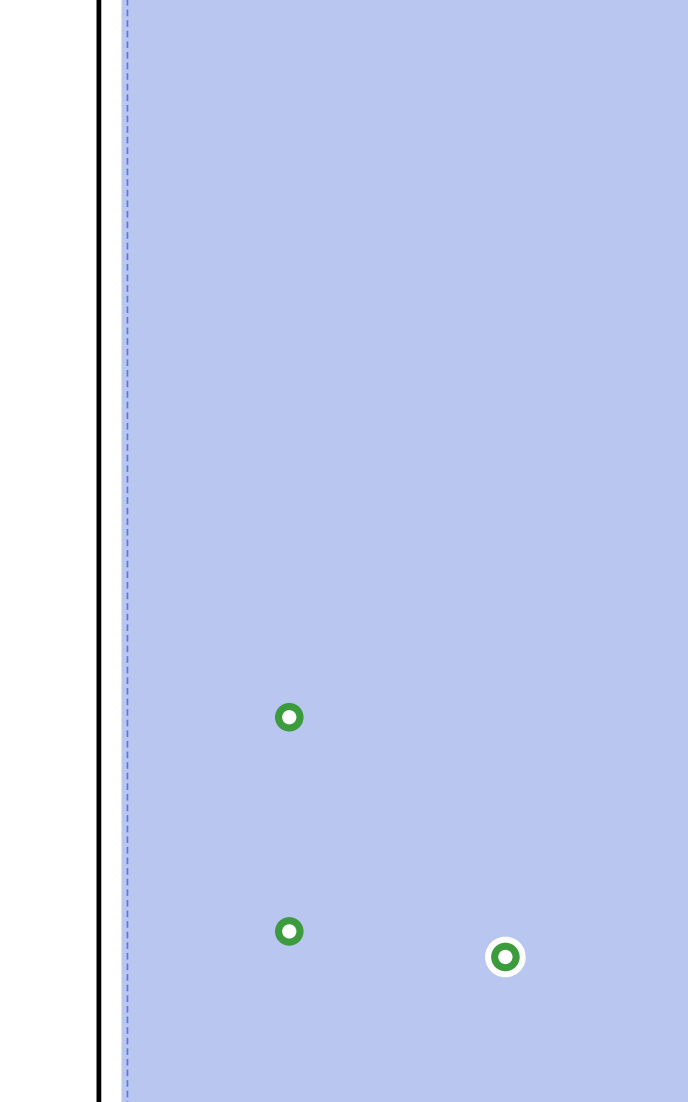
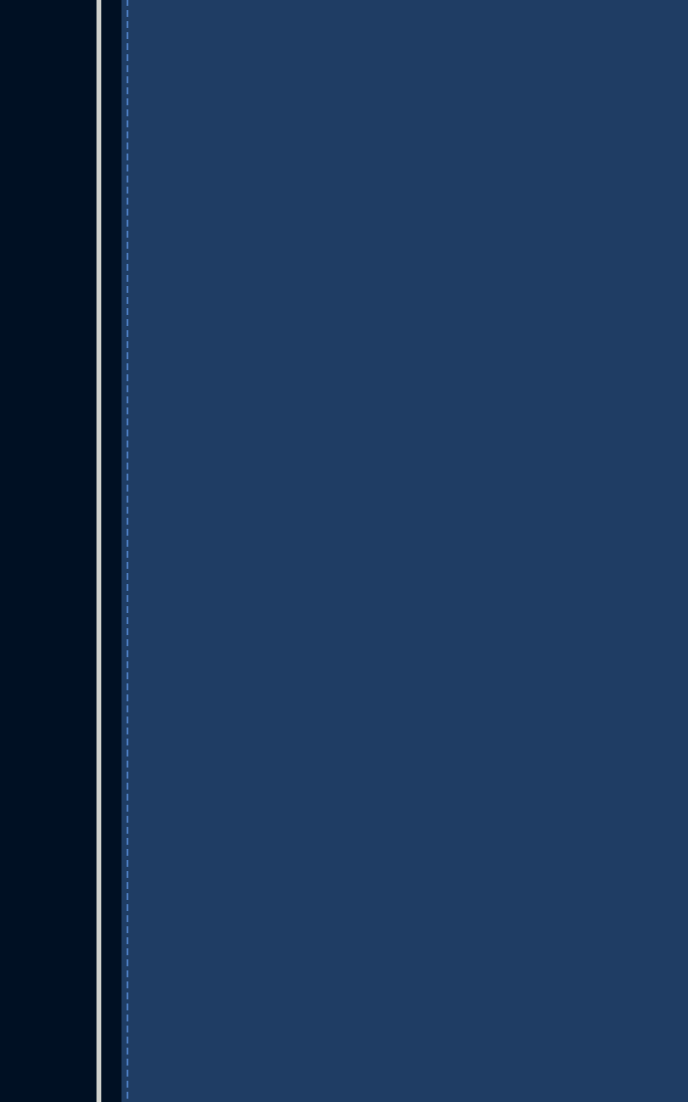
via: (289, 717) -> none
via: (289, 931) -> none
via: (505, 956) -> none

